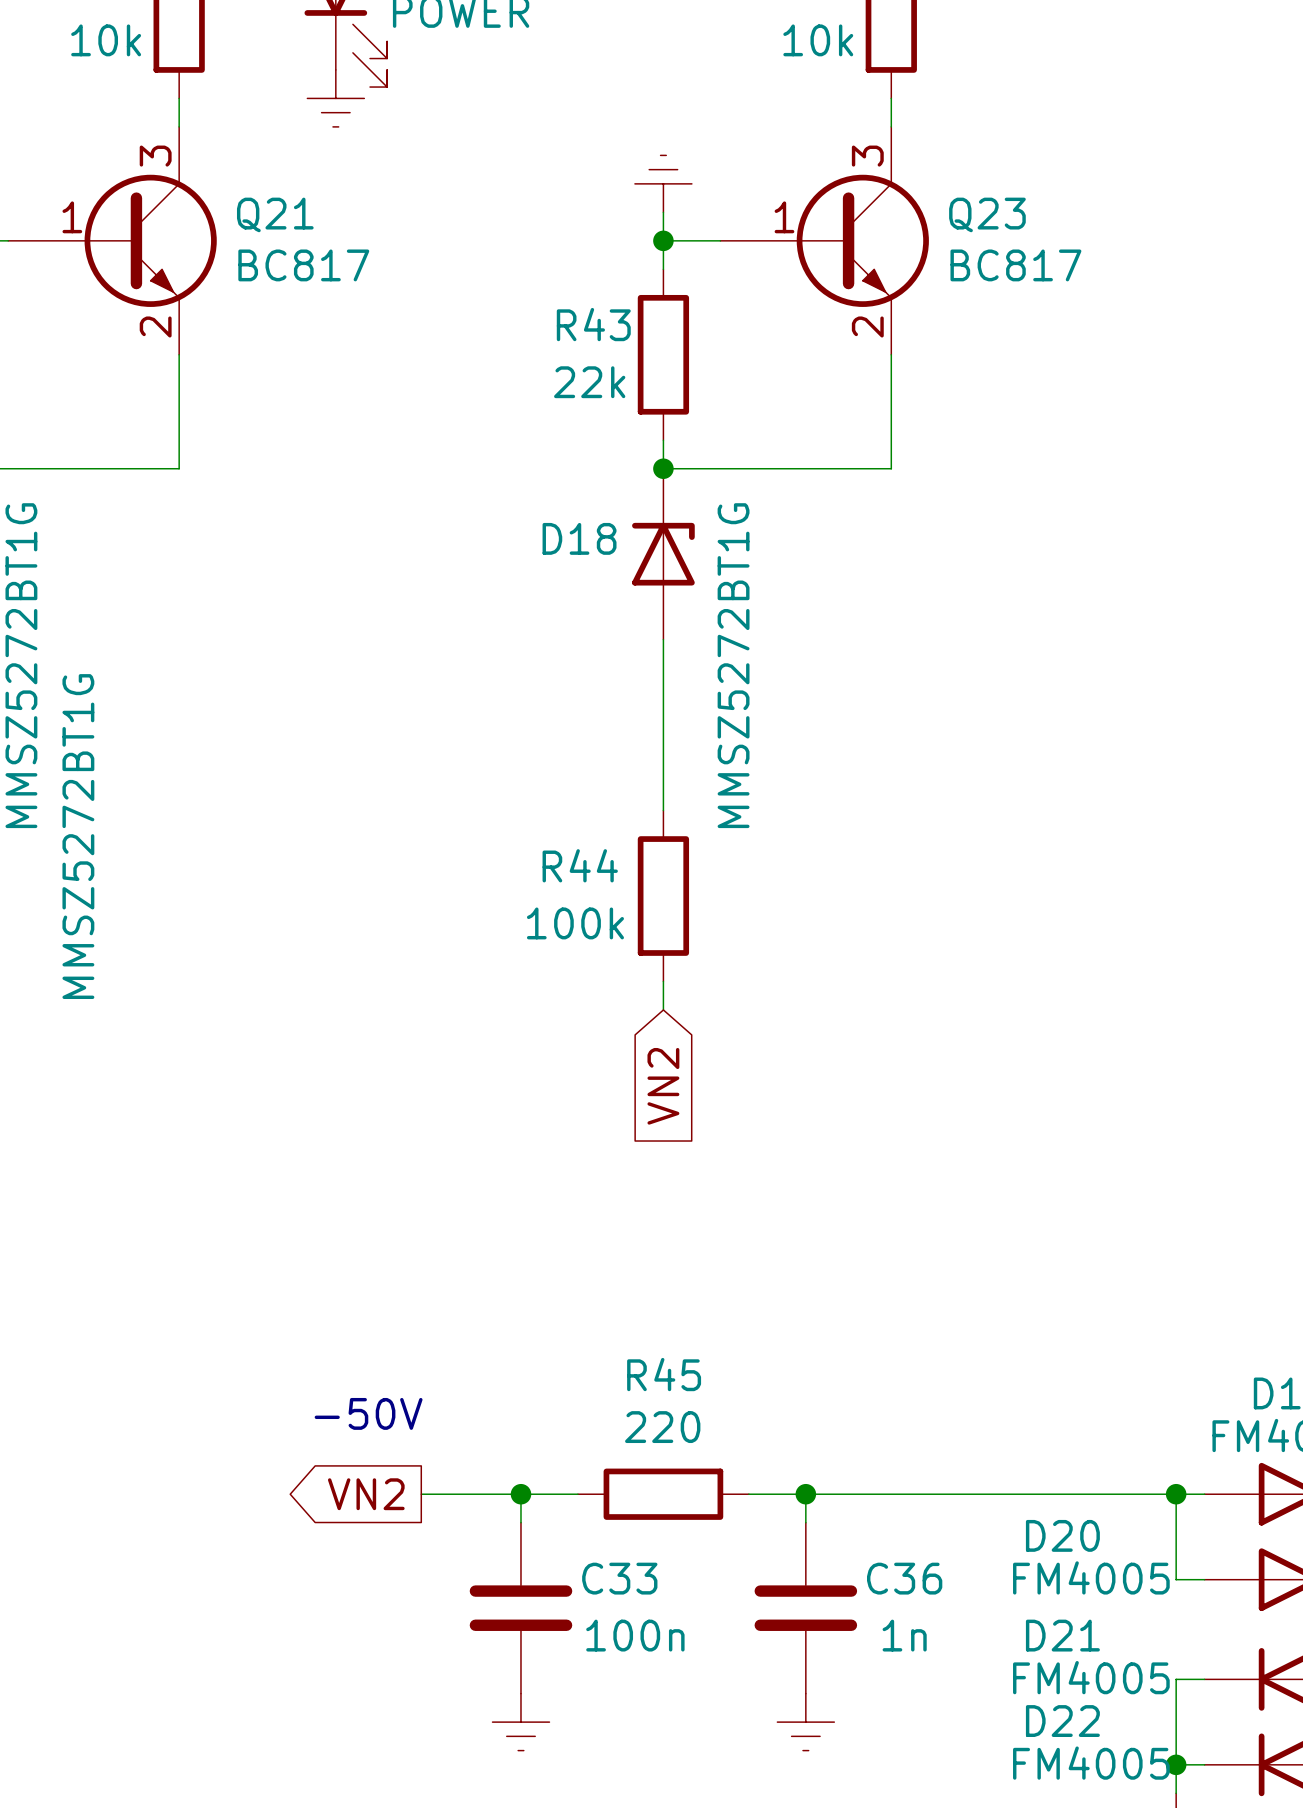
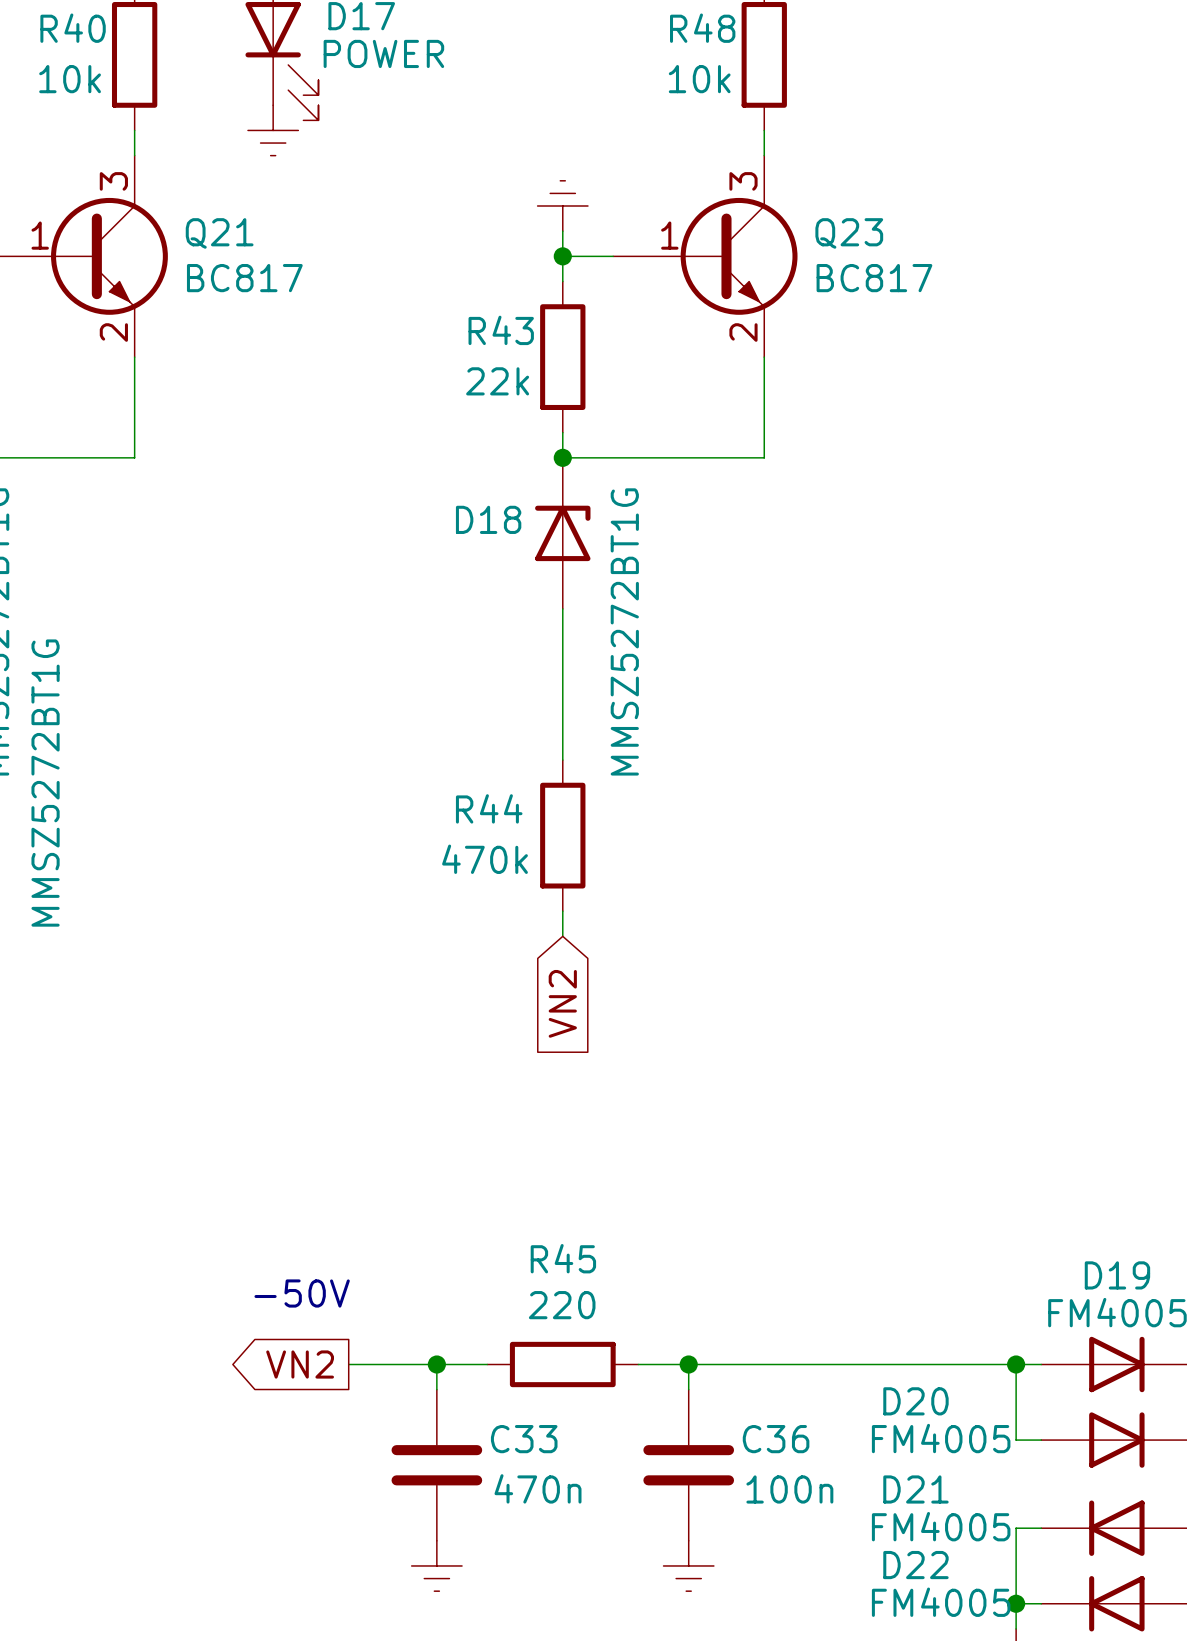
R44 value: 100k (575, 923) -> 470k (485, 859)
C33 value: 100n (635, 1635) -> 470n (538, 1488)
C36 value: 1n (904, 1635) -> 100n (789, 1489)

